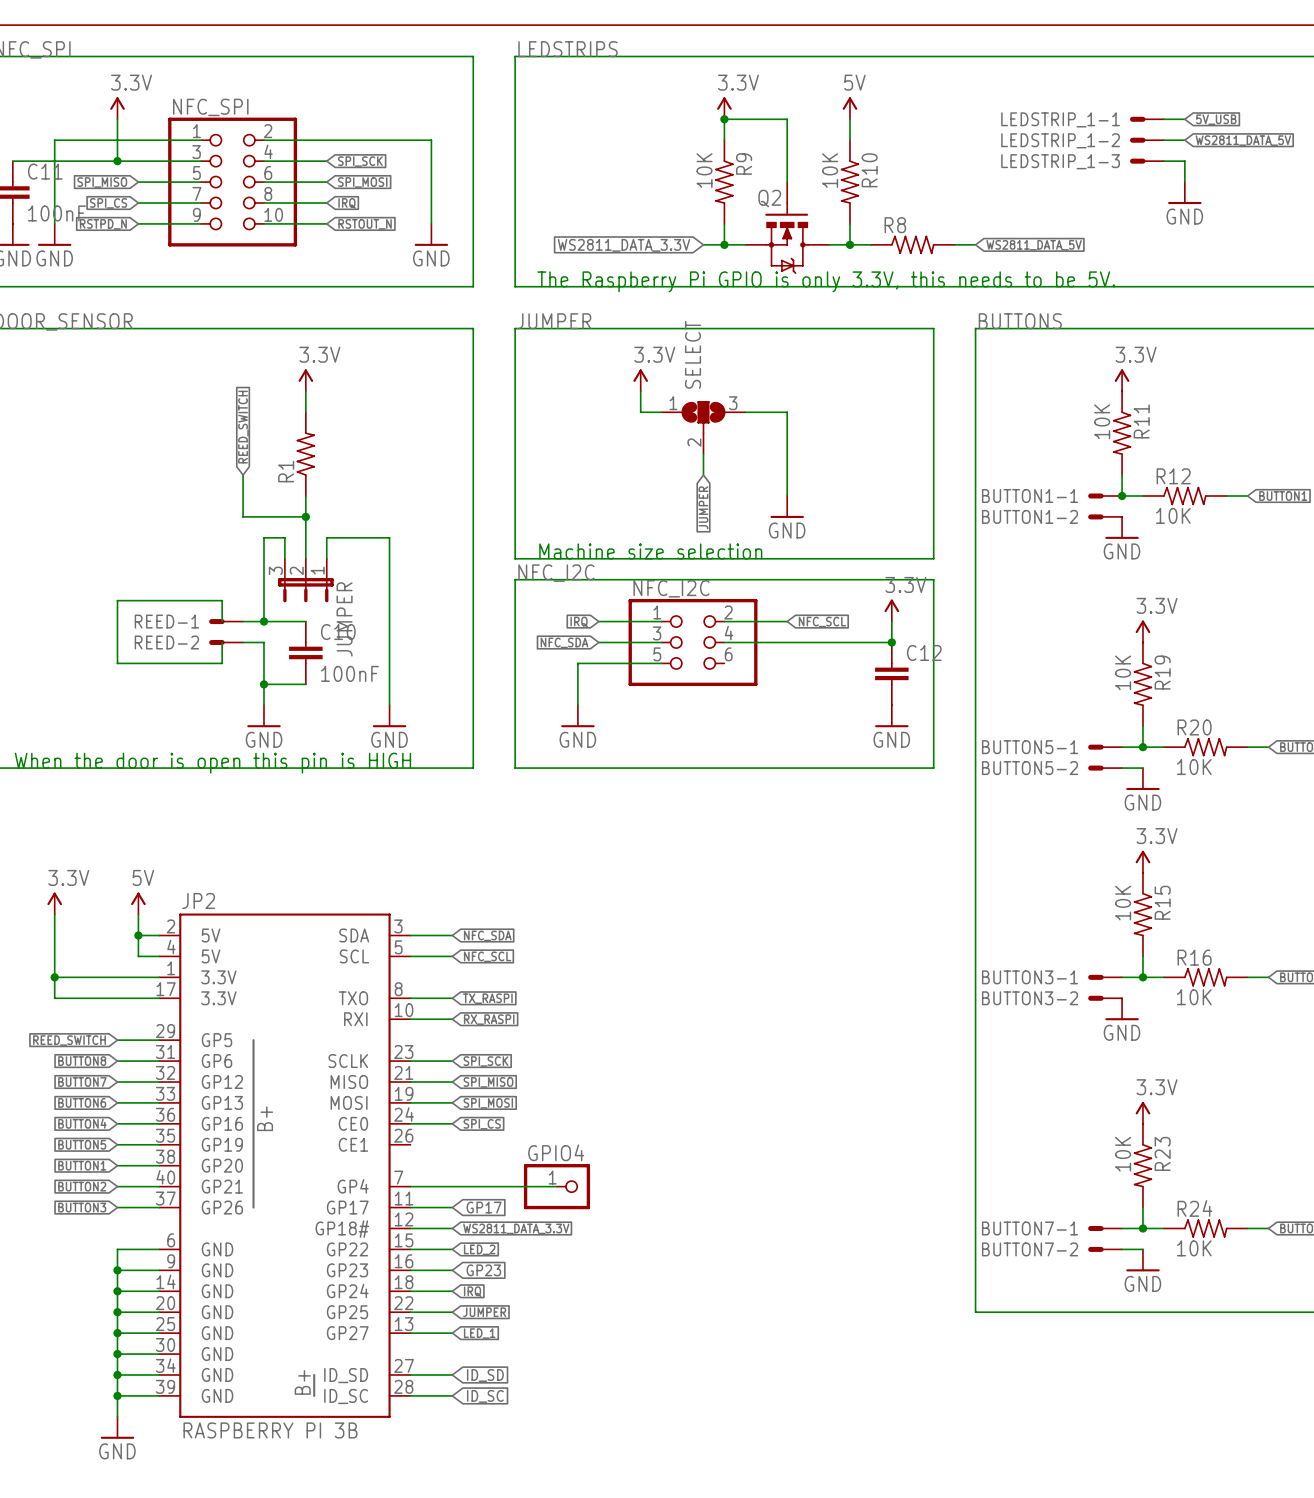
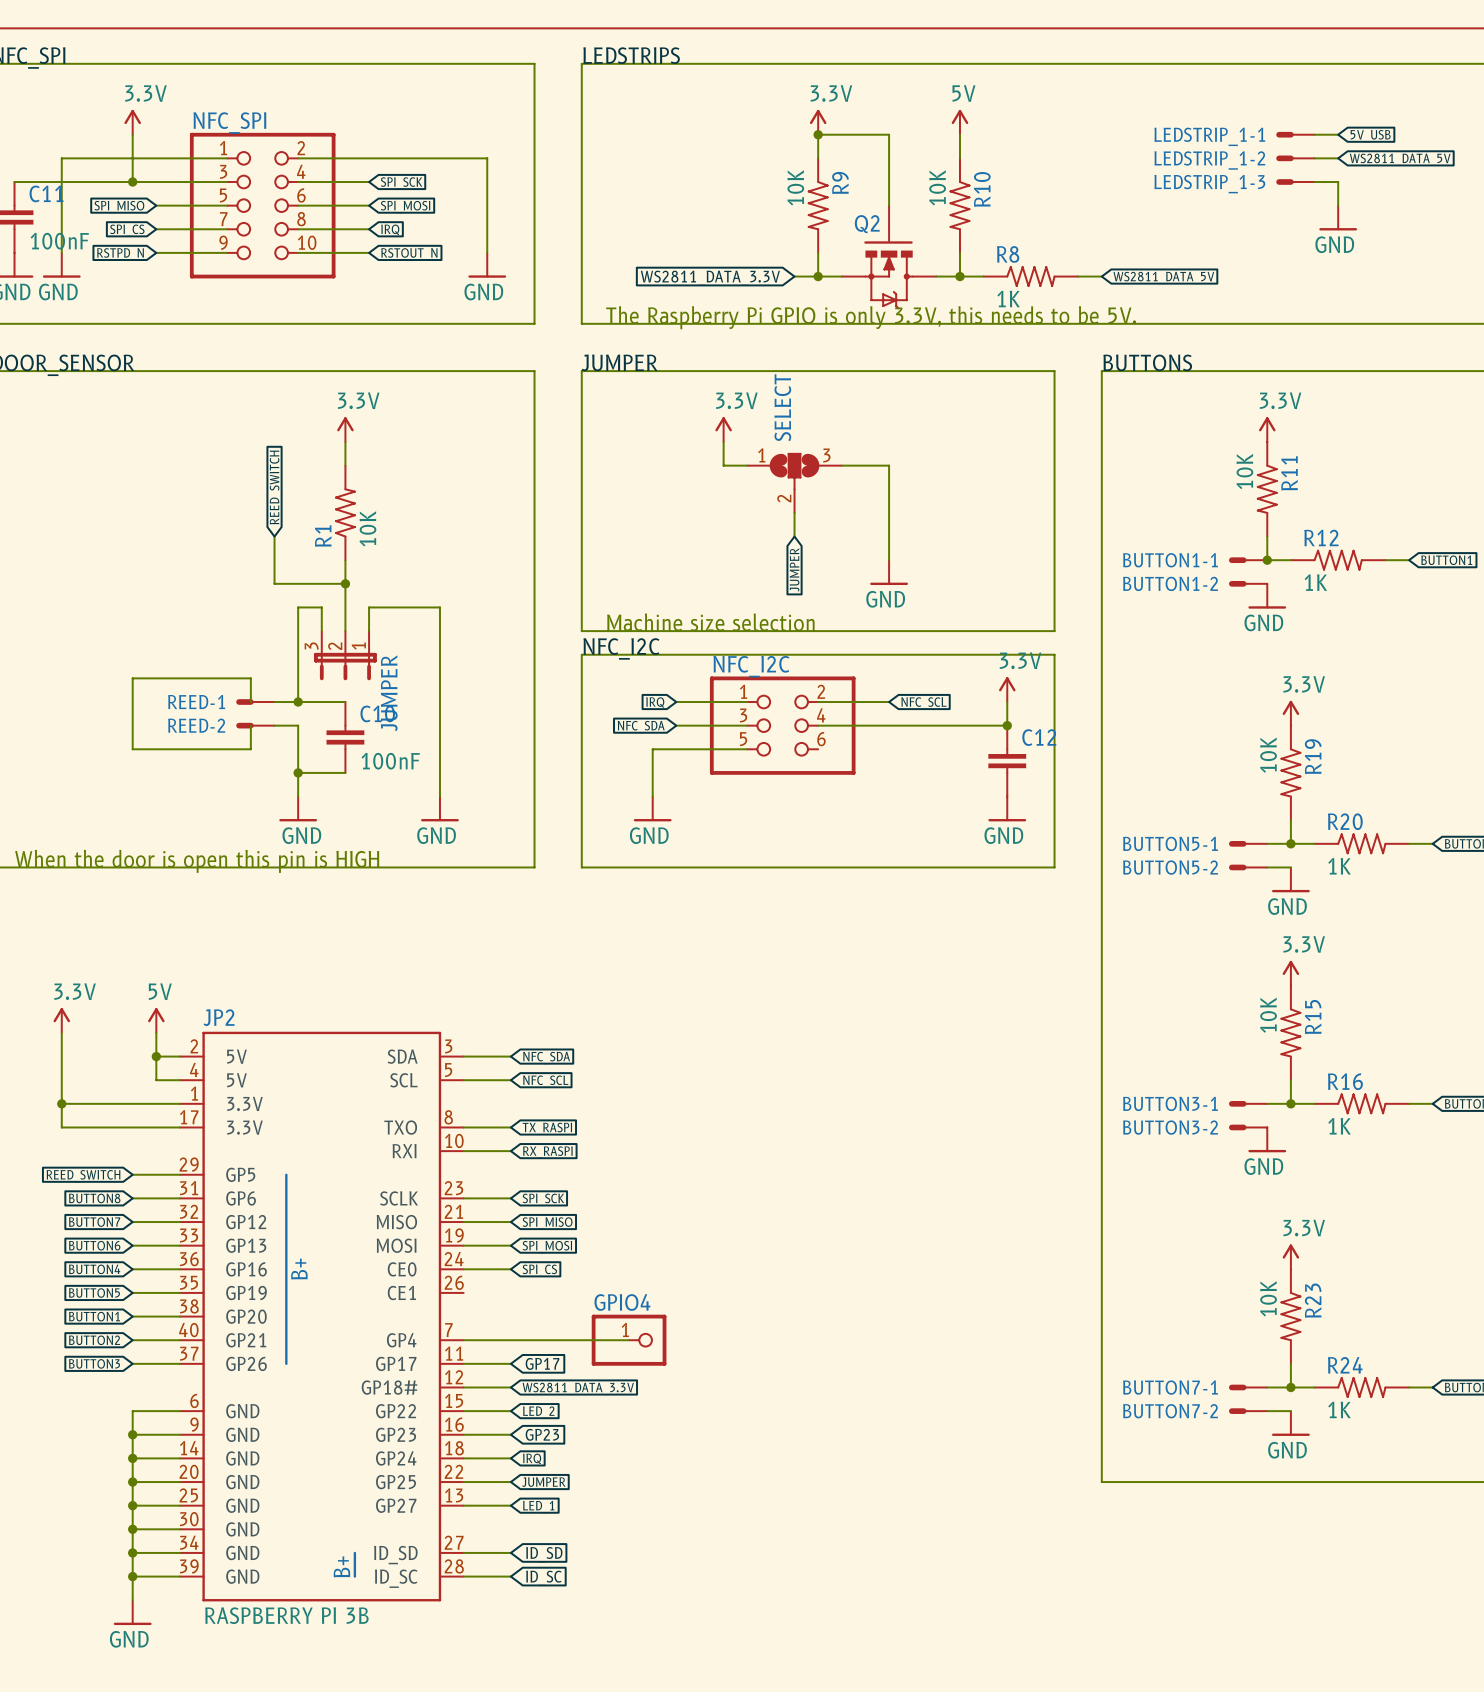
R8 value: none -> 1K (1008, 299)
R1 value: none -> 10K (367, 528)
R12 value: 10K (1173, 515) -> 1K (1315, 582)
R20 value: 10K (1194, 767) -> 1K (1339, 866)
R16 value: 10K (1194, 997) -> 1K (1339, 1126)
R24 value: 10K (1194, 1248) -> 1K (1339, 1409)

